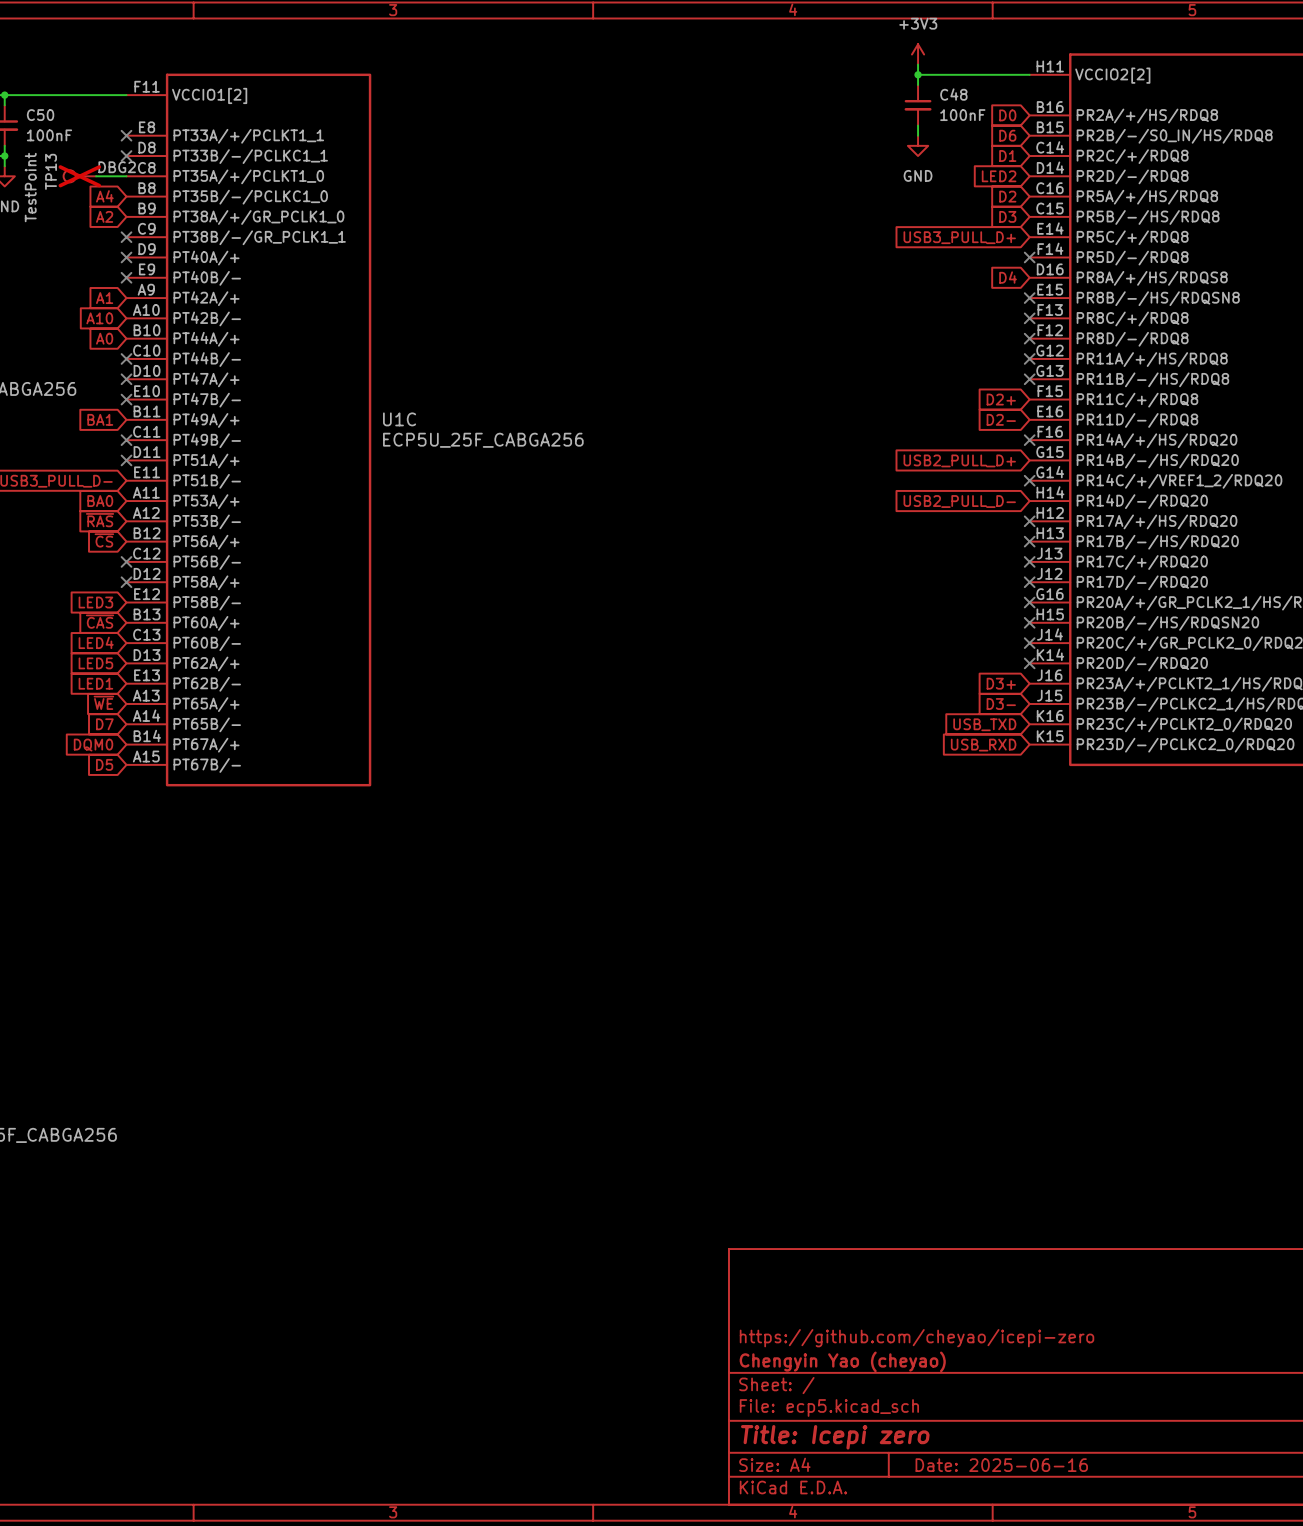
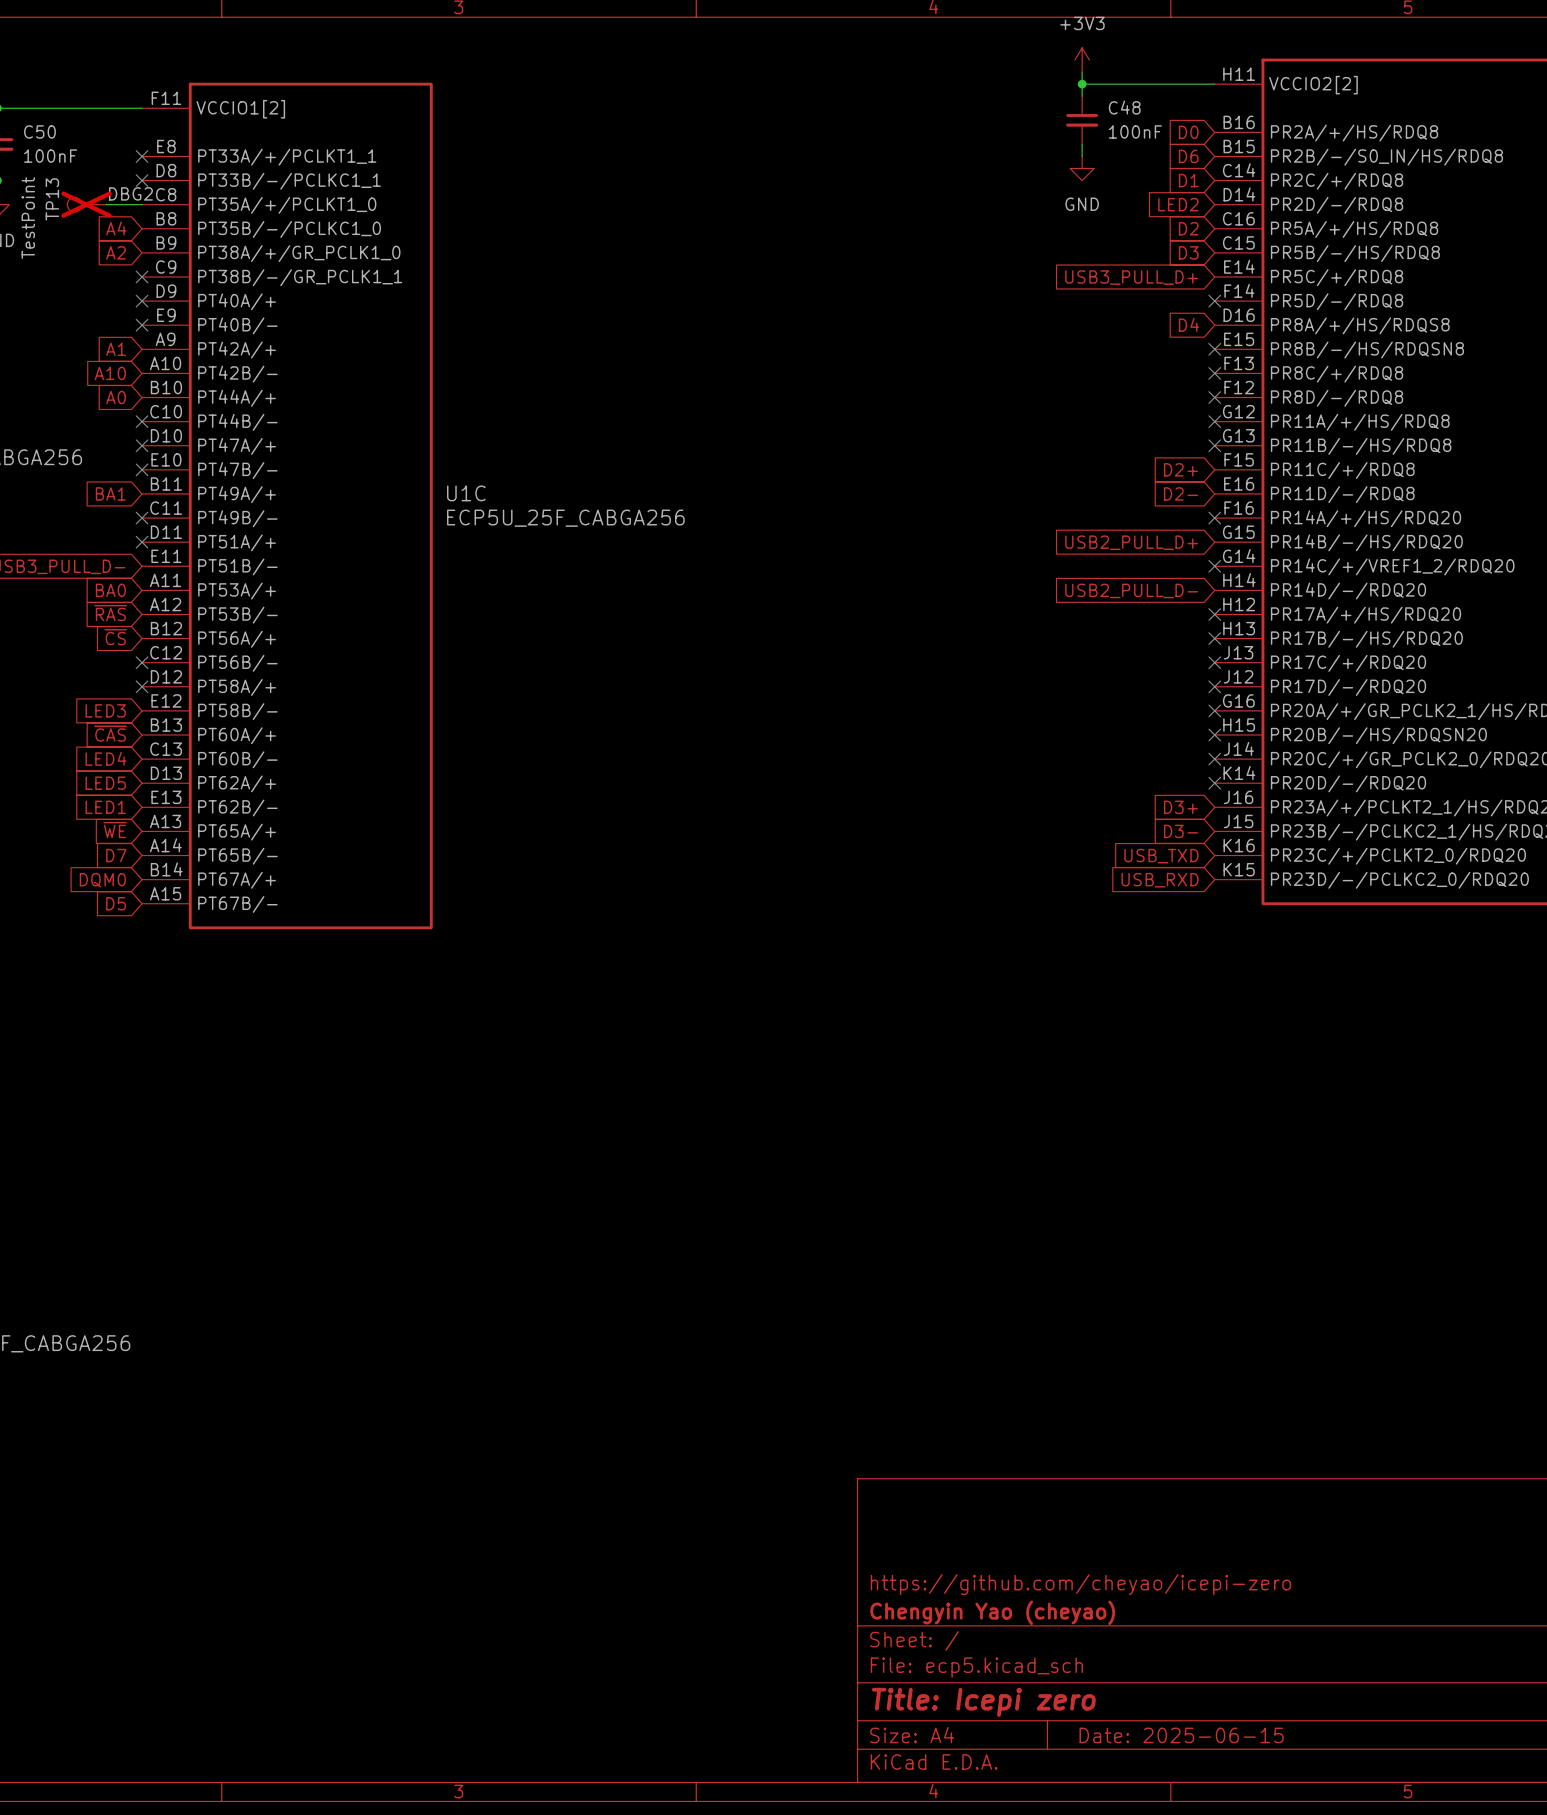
title block: Date: 2025-06-16 (1001, 1465) -> Date: 2025-06-15 (1181, 1735)

